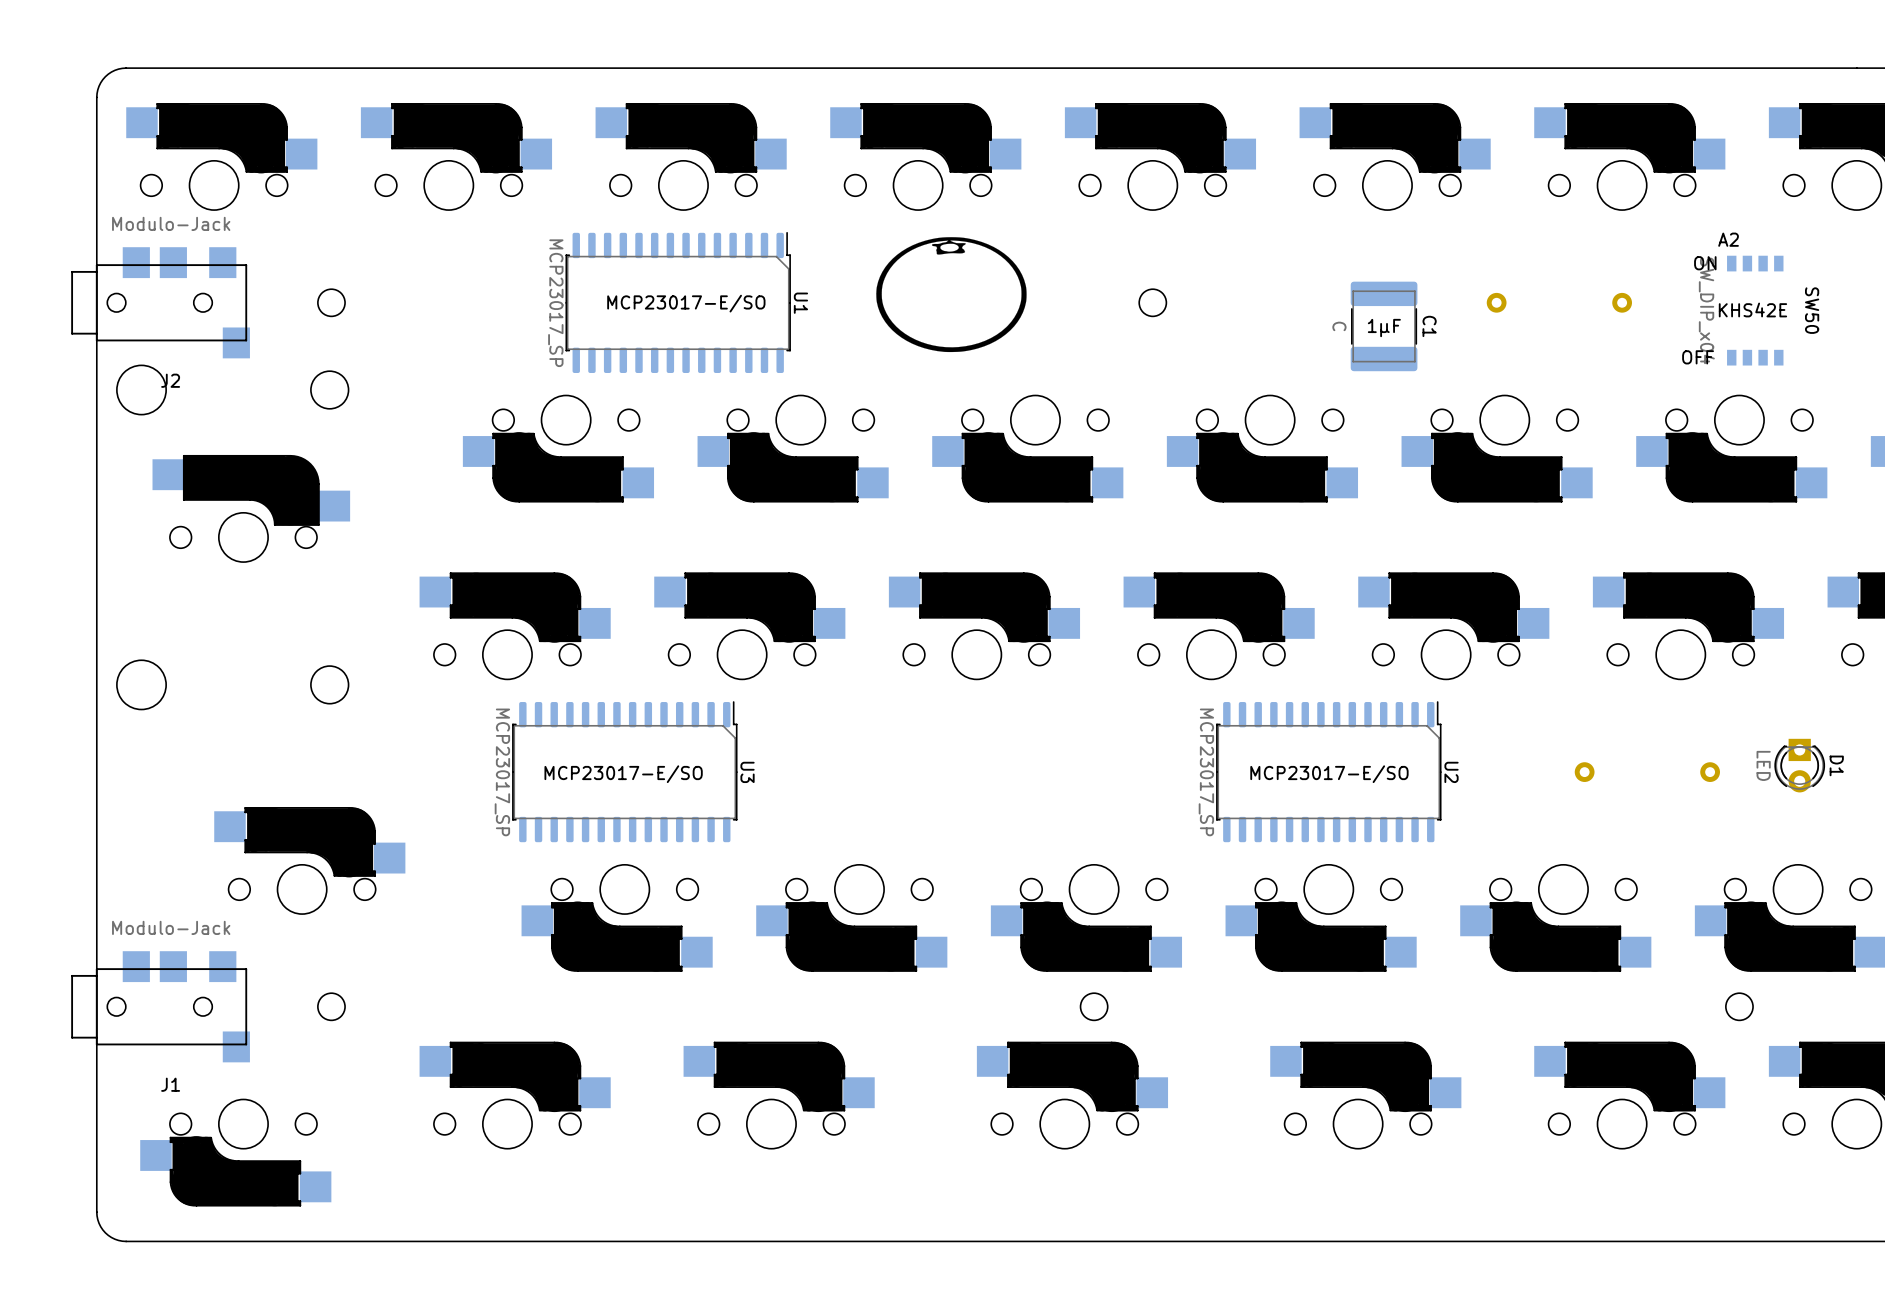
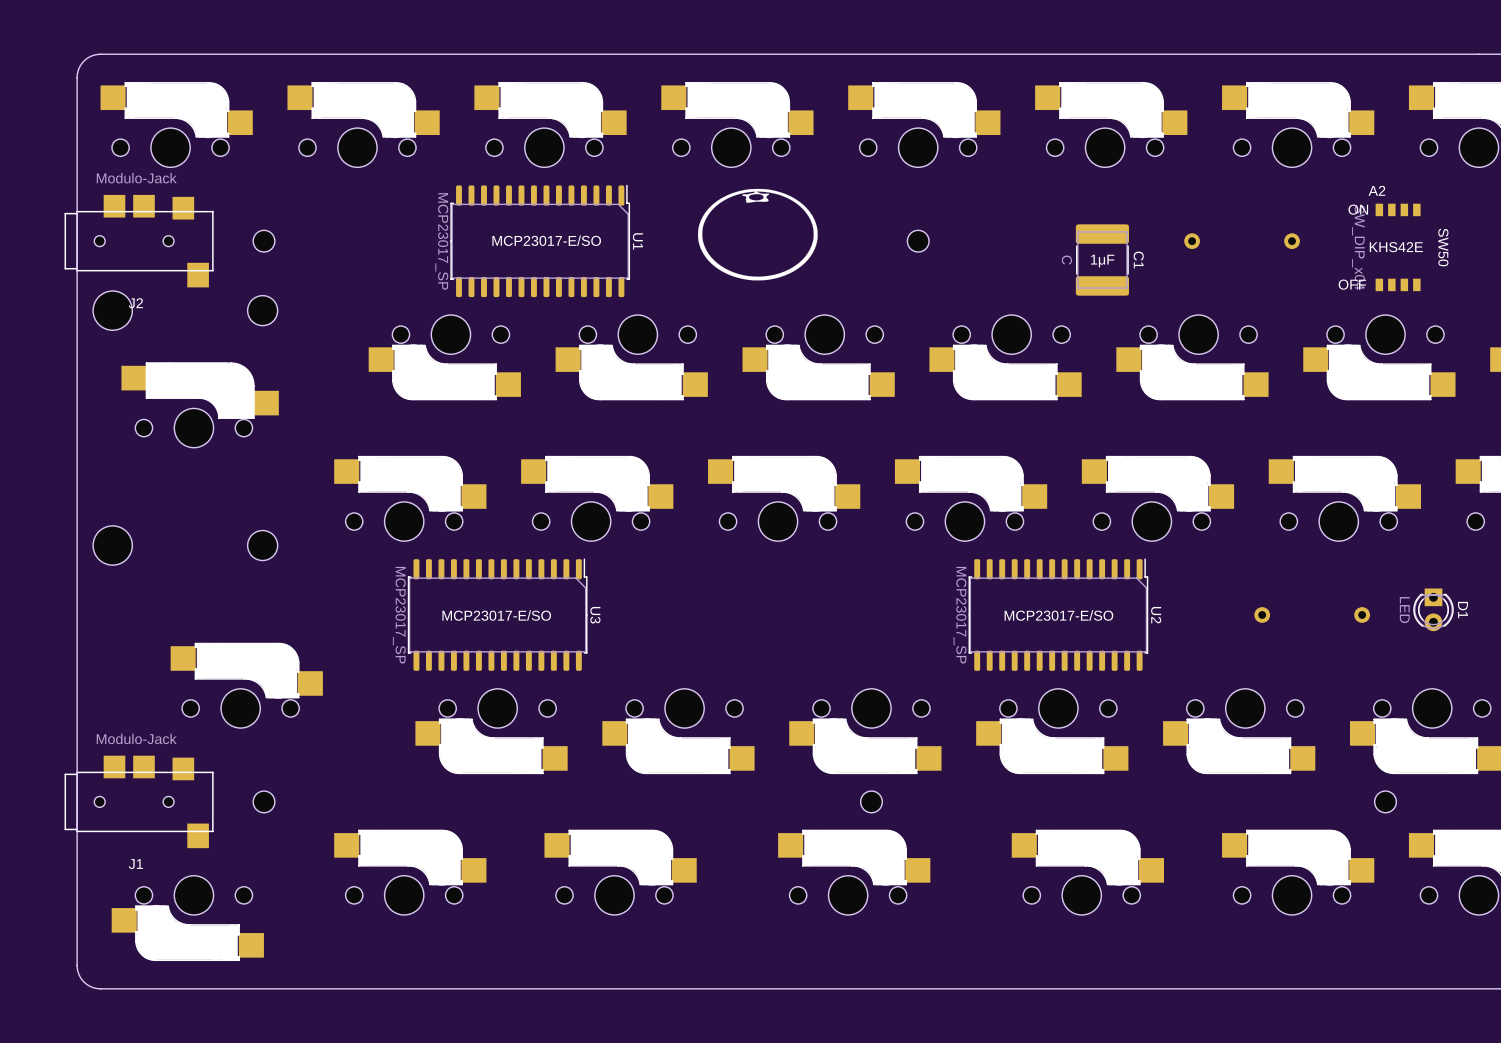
J2 footprint: [71, 247, 250, 359] -> [64, 194, 214, 288]
J1 footprint: [71, 951, 250, 1063] -> [64, 755, 214, 849]

